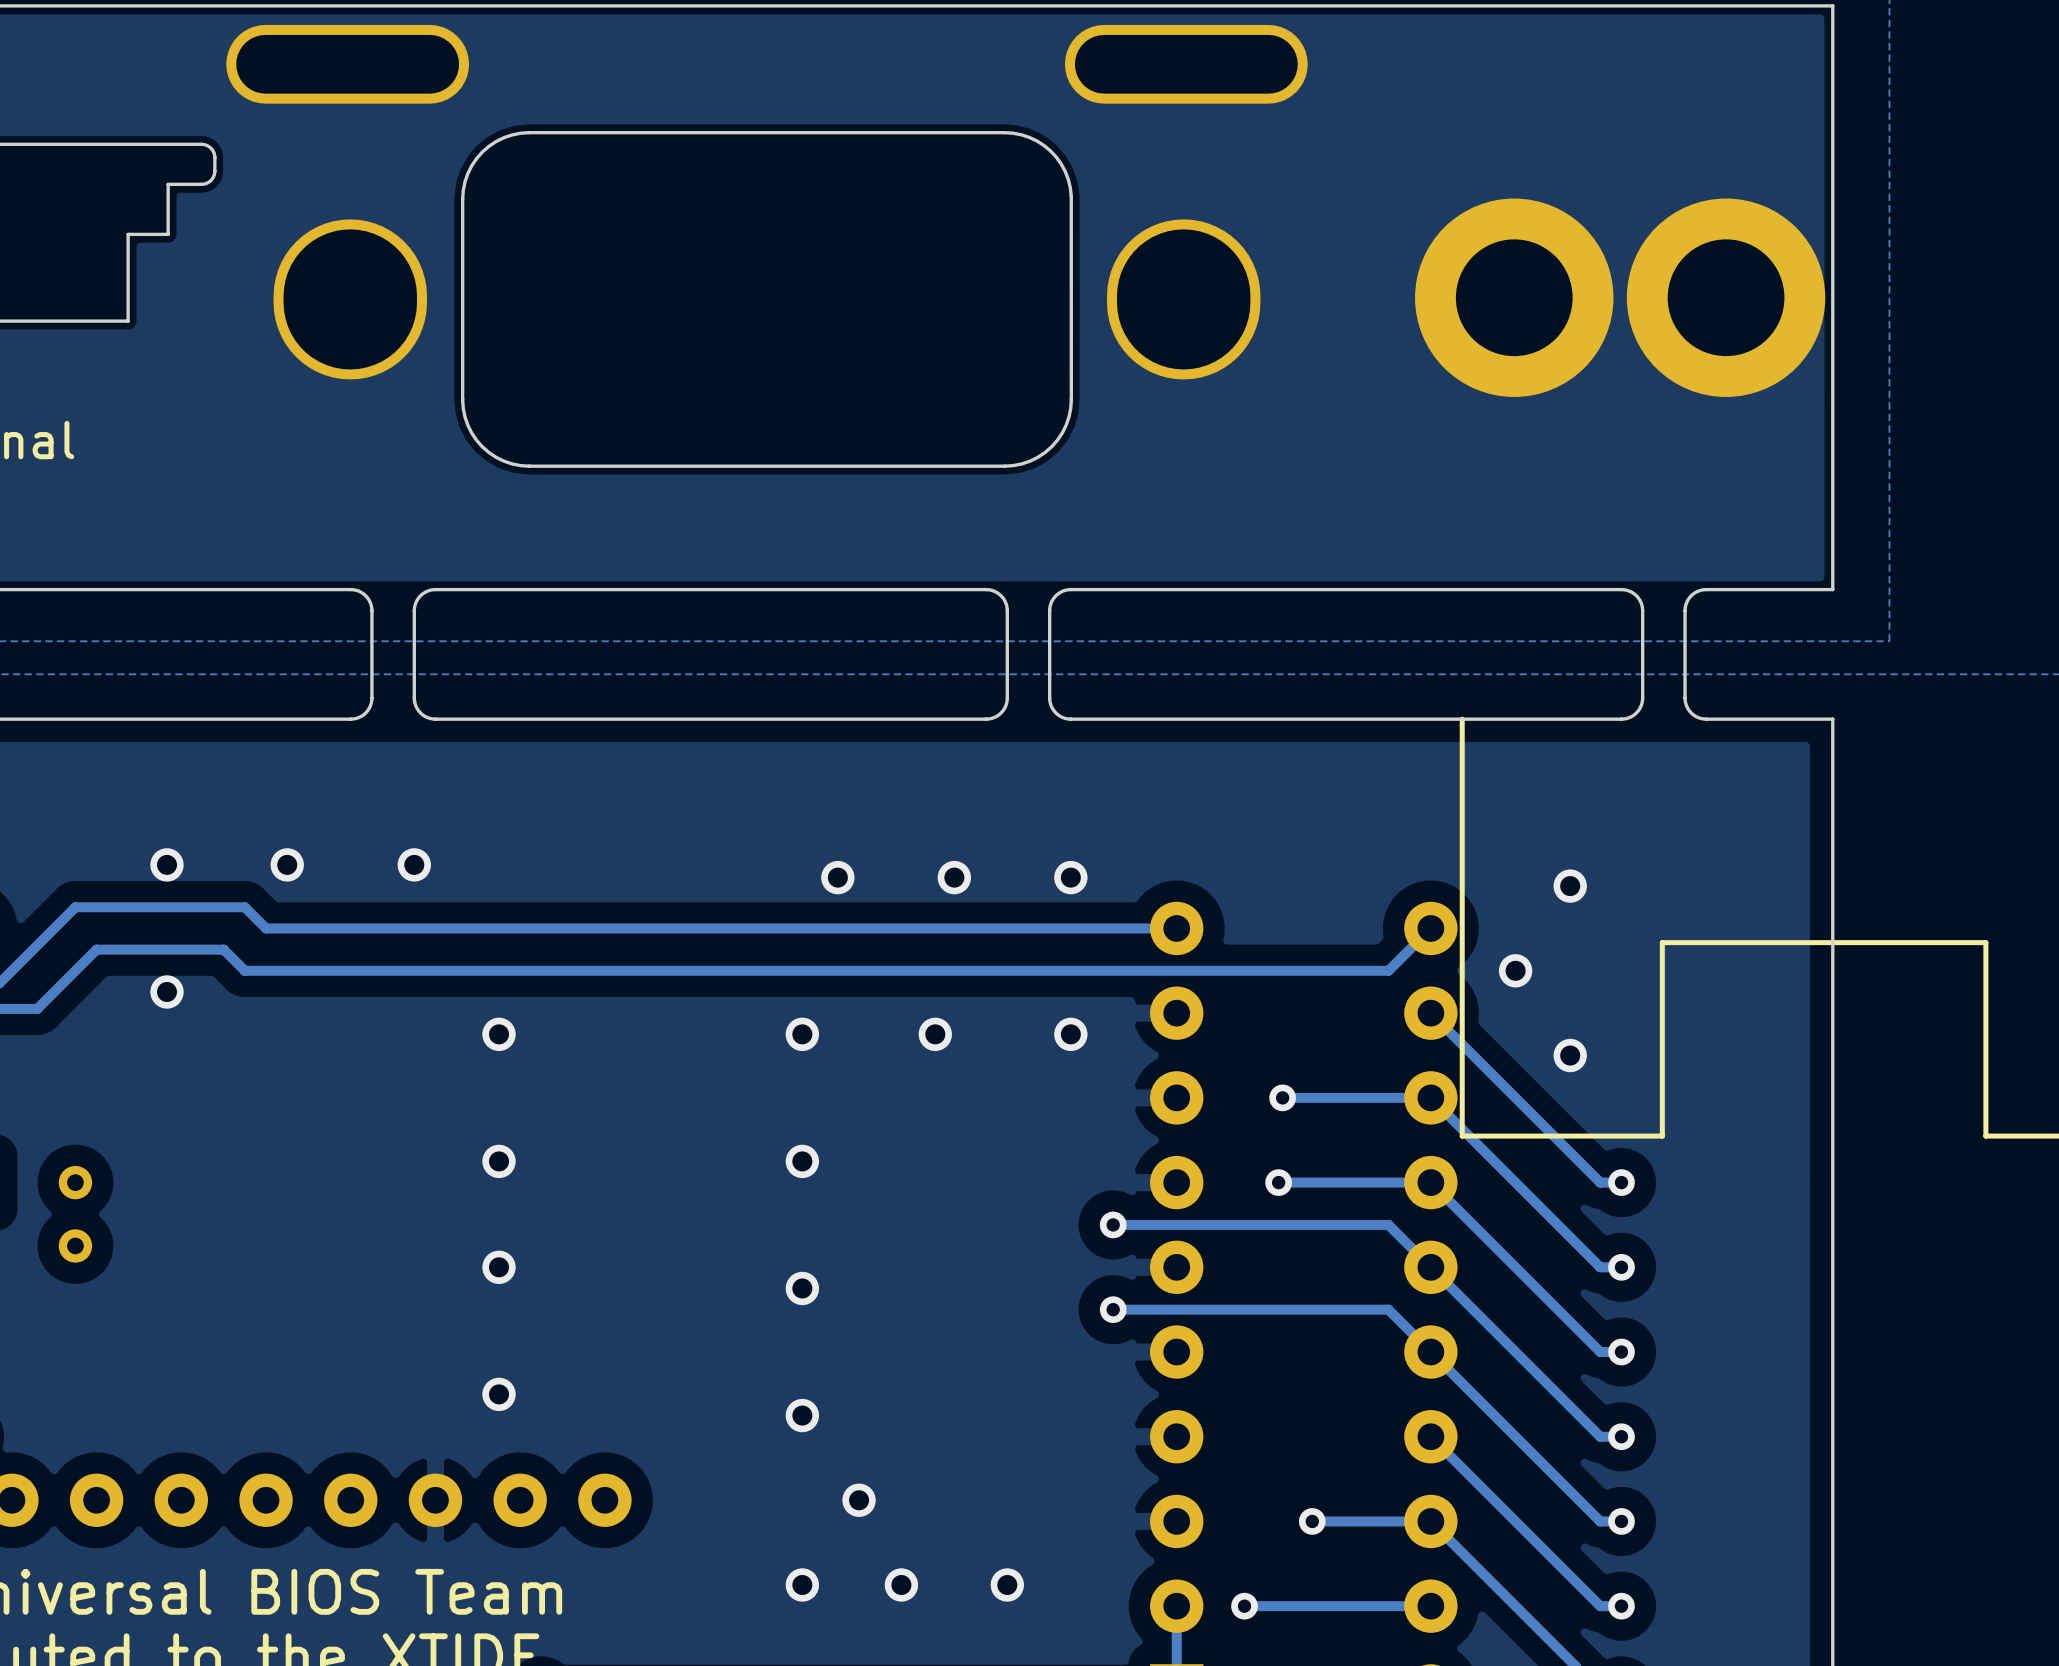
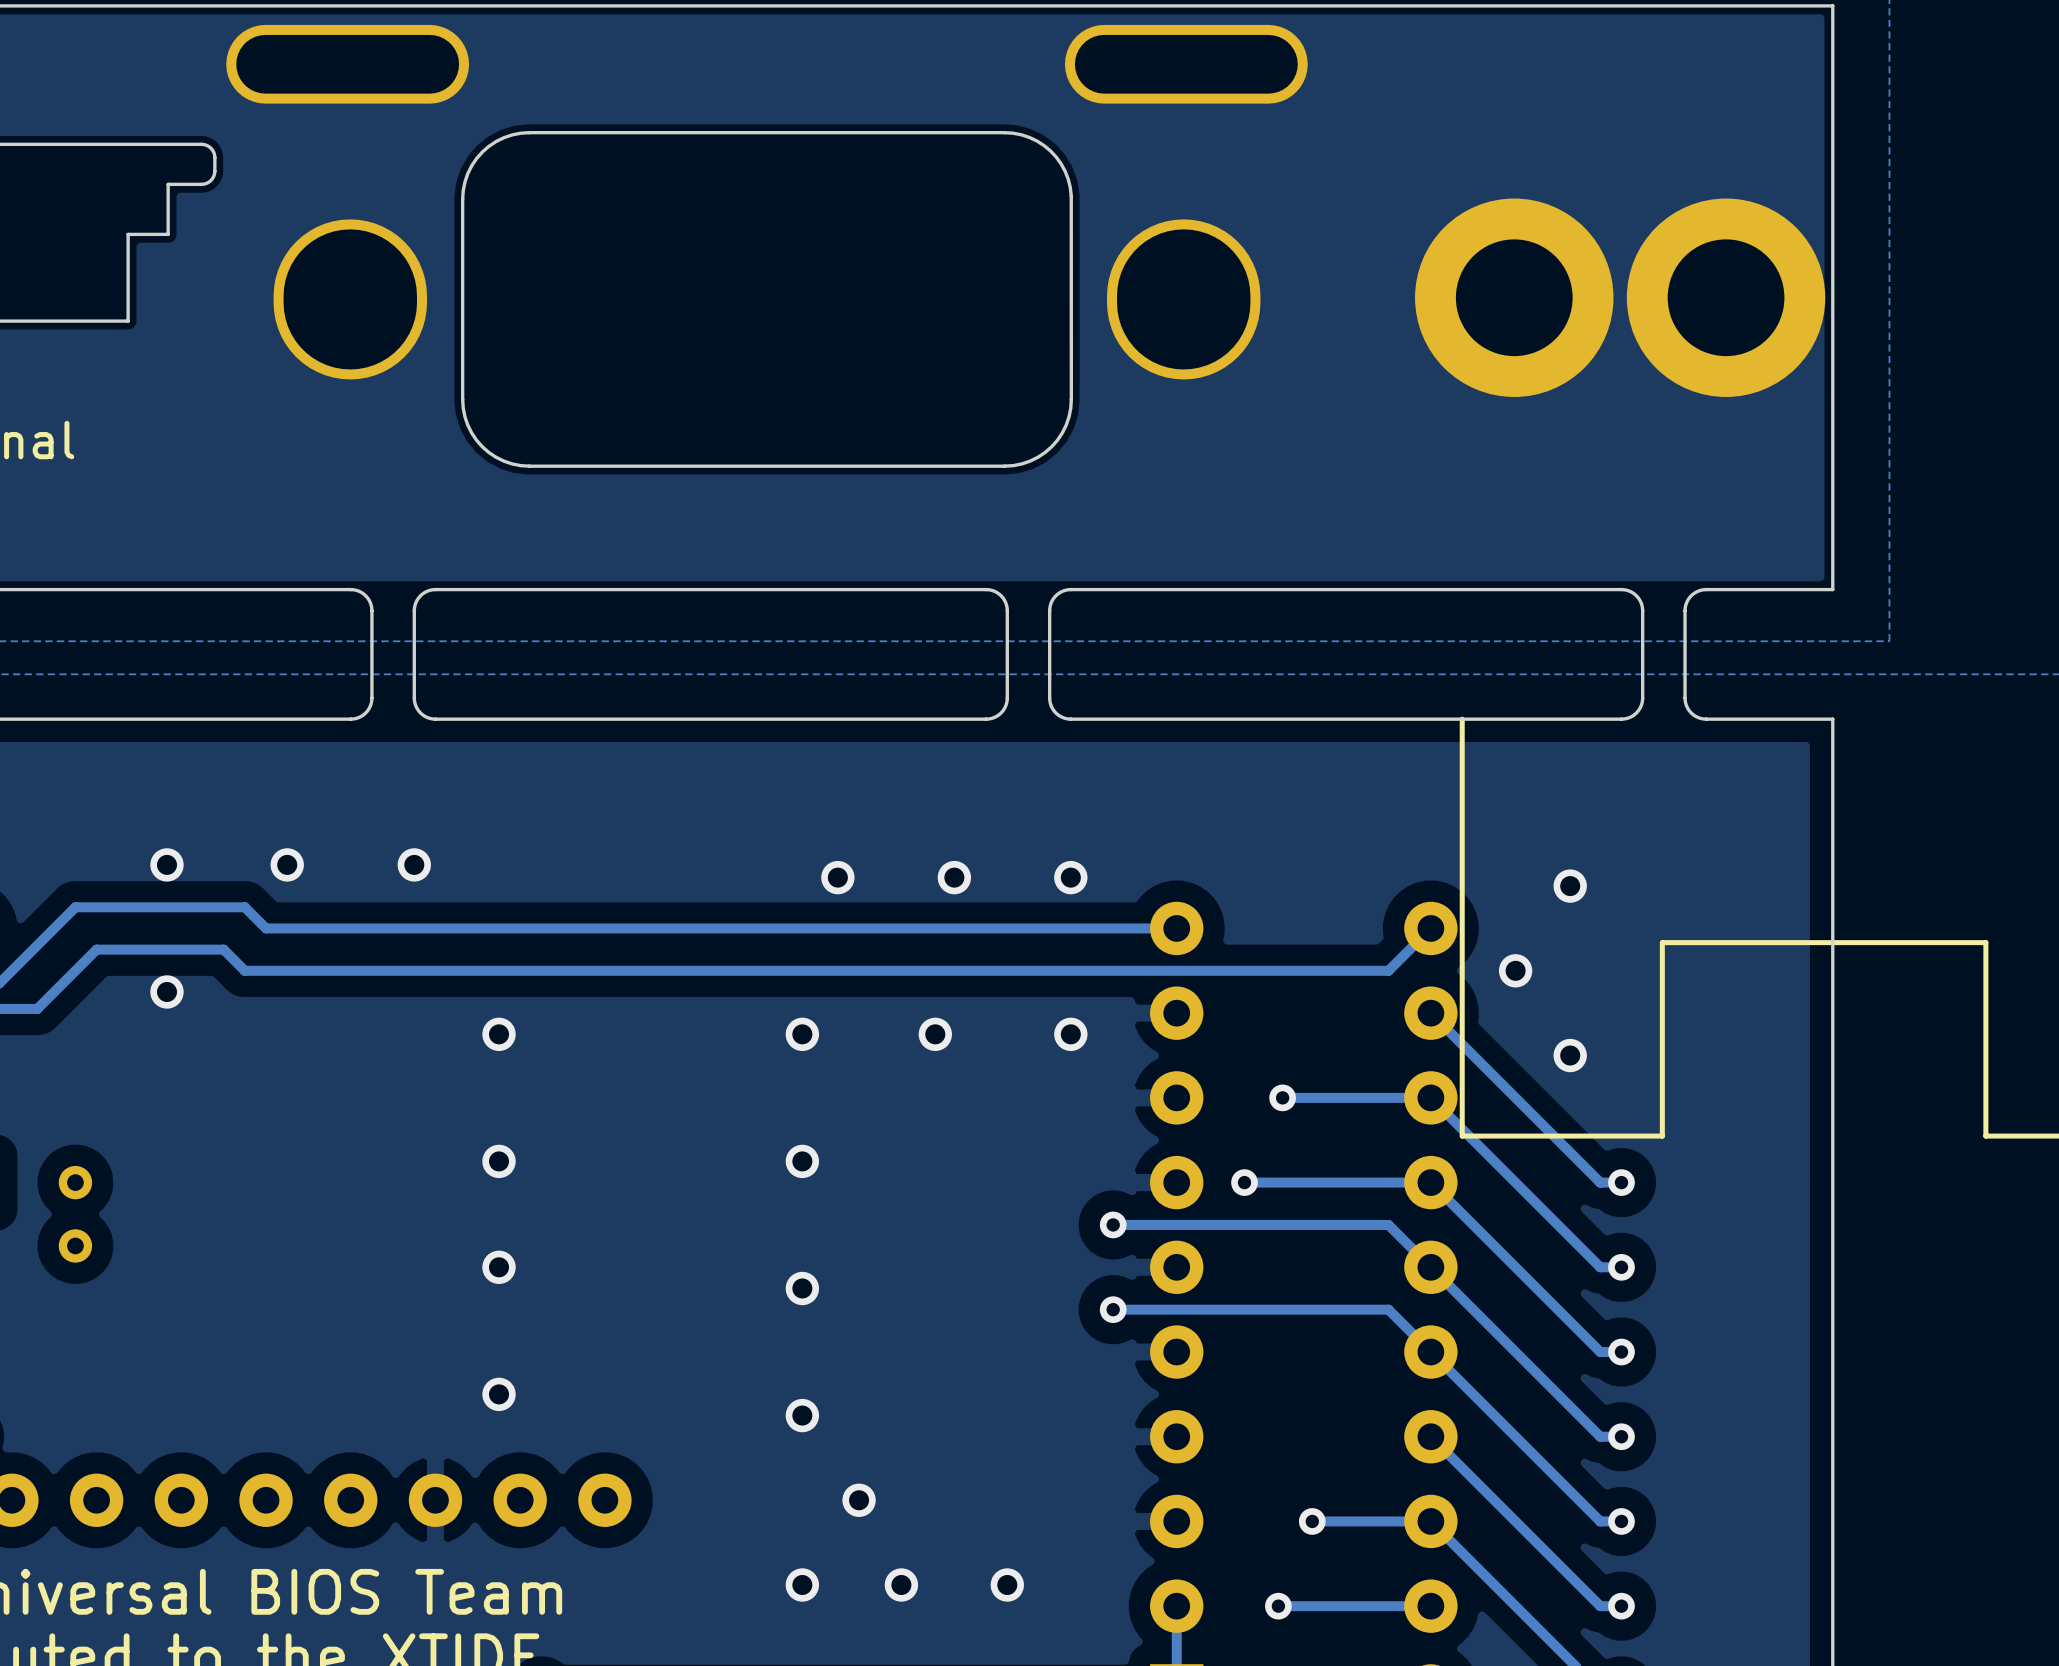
via position: (1278, 1182) -> (1244, 1182)
via position: (1244, 1606) -> (1278, 1606)
track: (1278, 1606) (1244, 1606) -> (1278, 1182) (1244, 1182)

